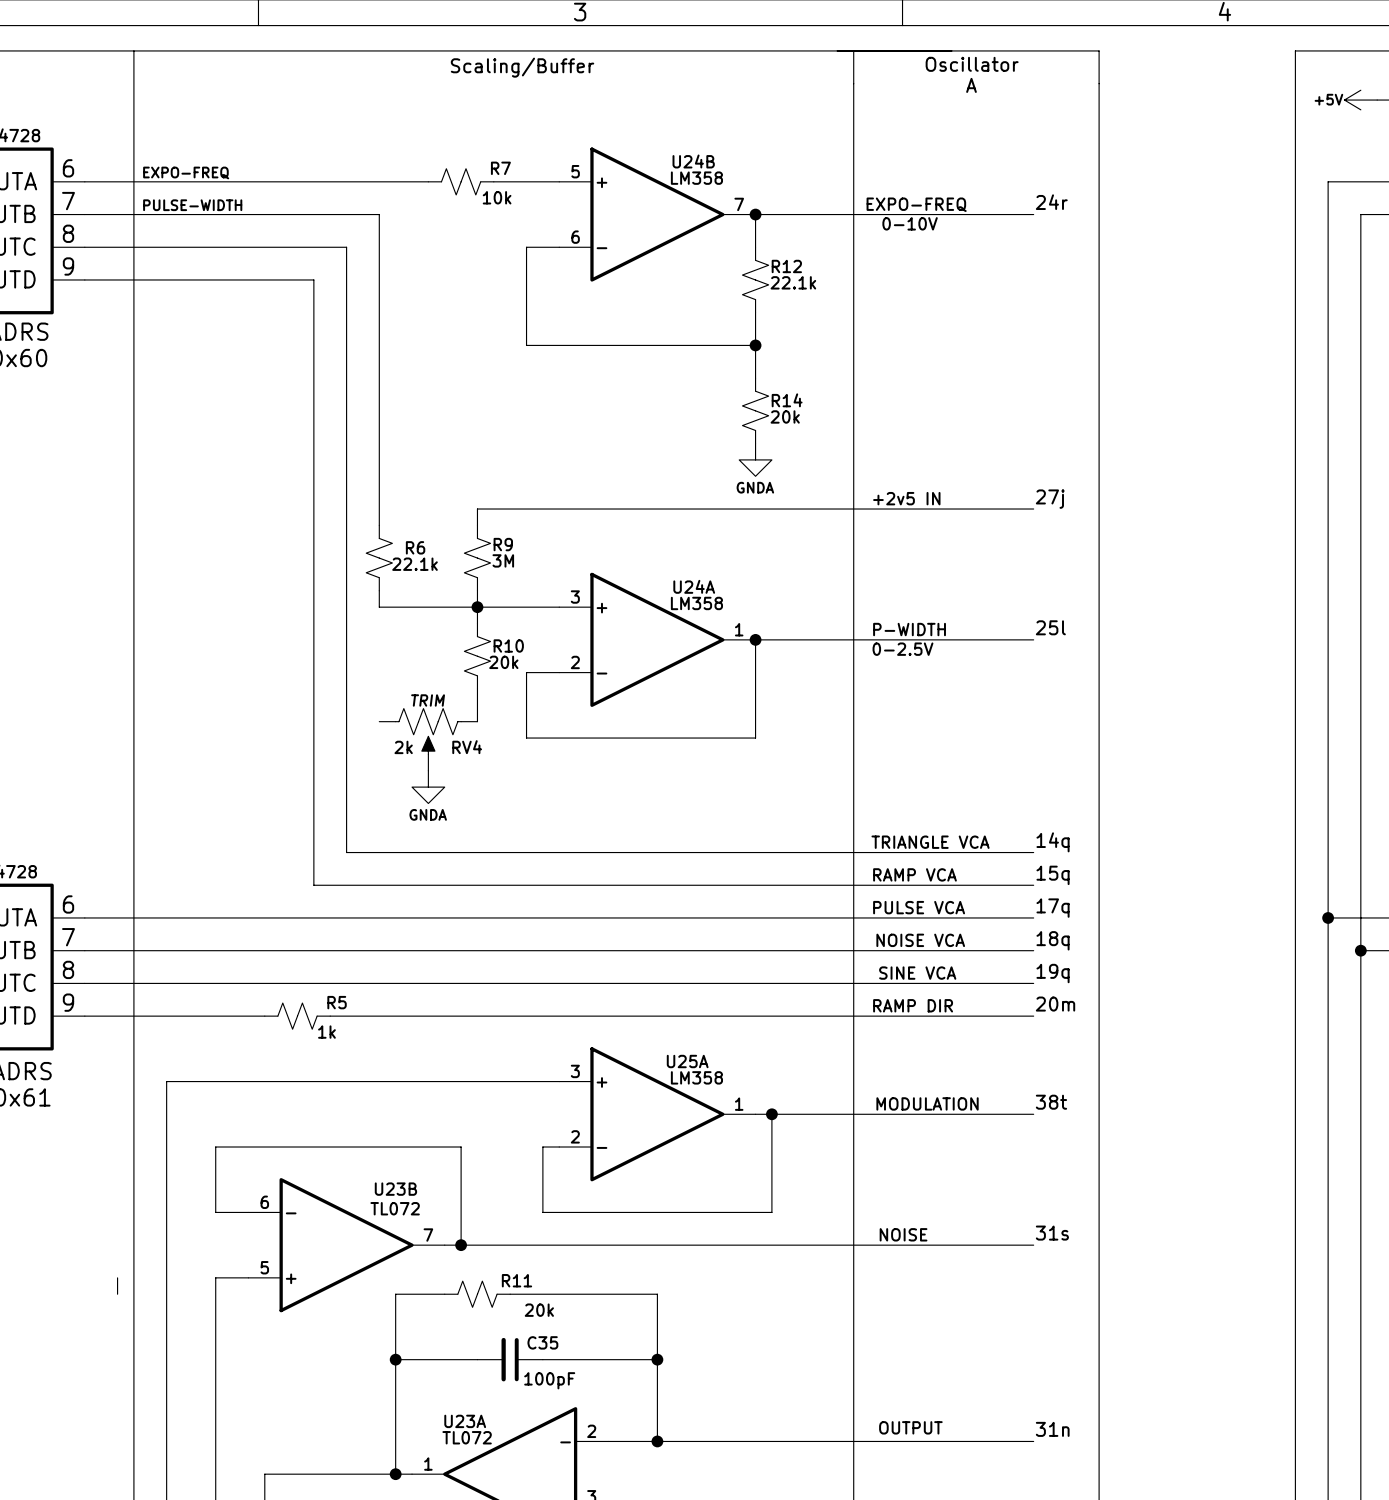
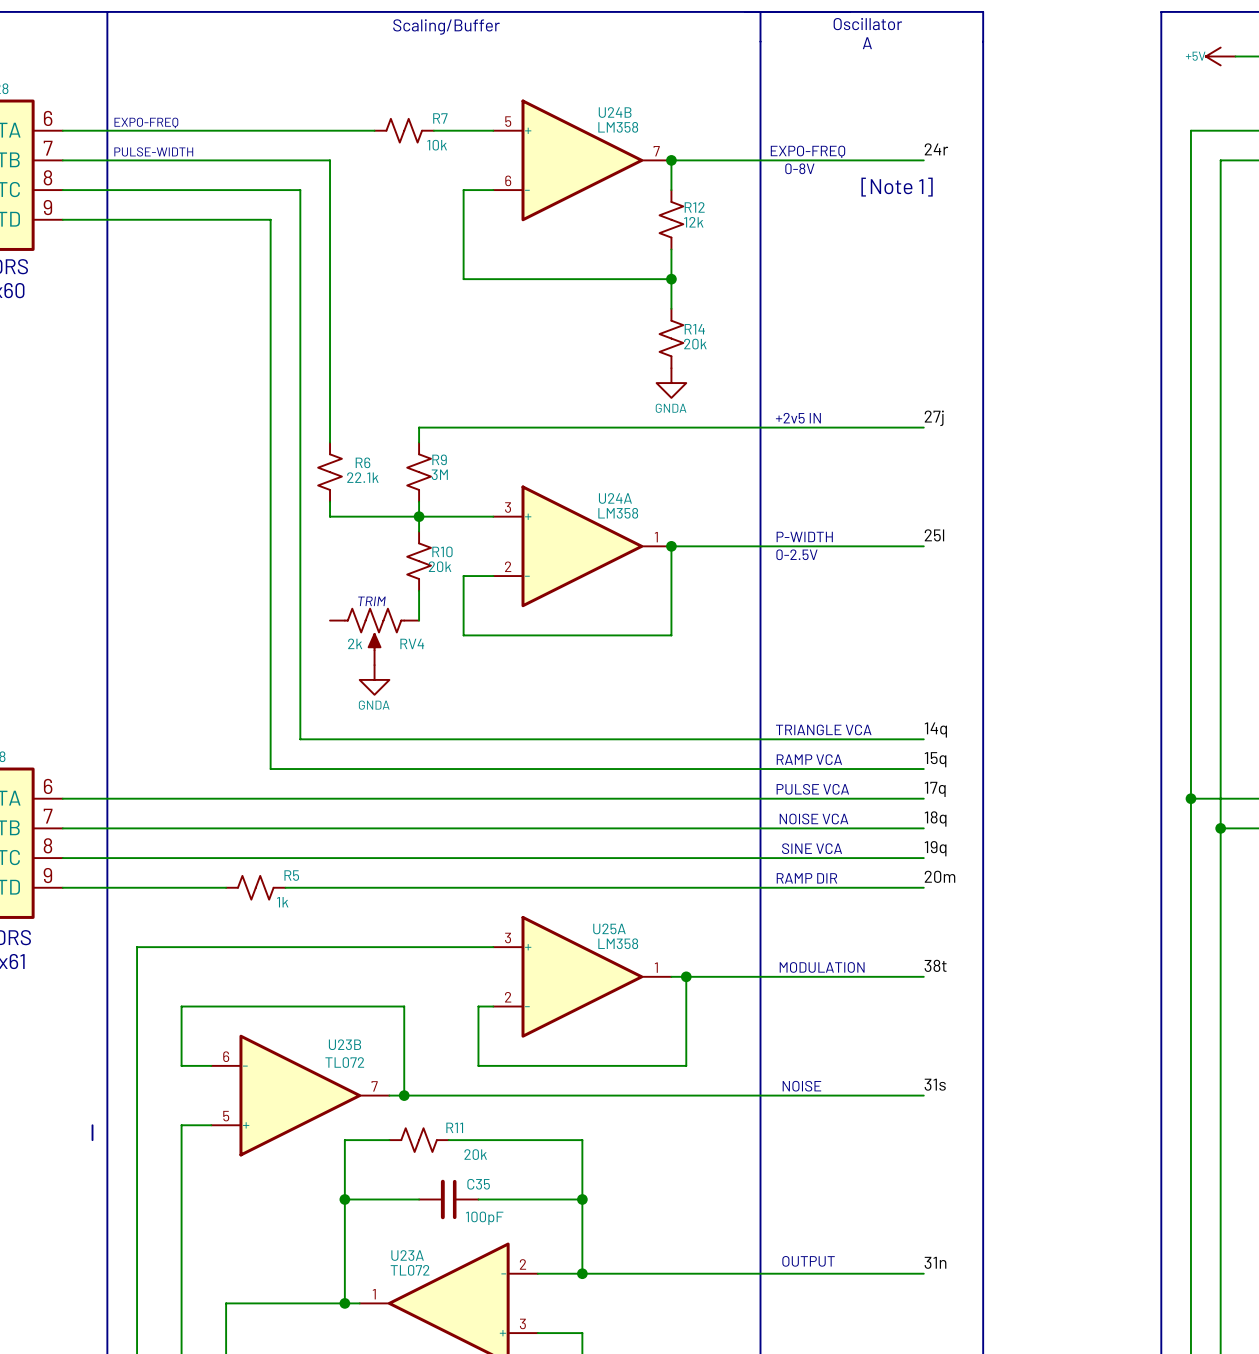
text: 0-10V (910, 223) -> 0-8V (799, 168)
text: none -> [Note 1] (897, 187)
R12 value: 22.1k (793, 282) -> 12k (693, 222)

